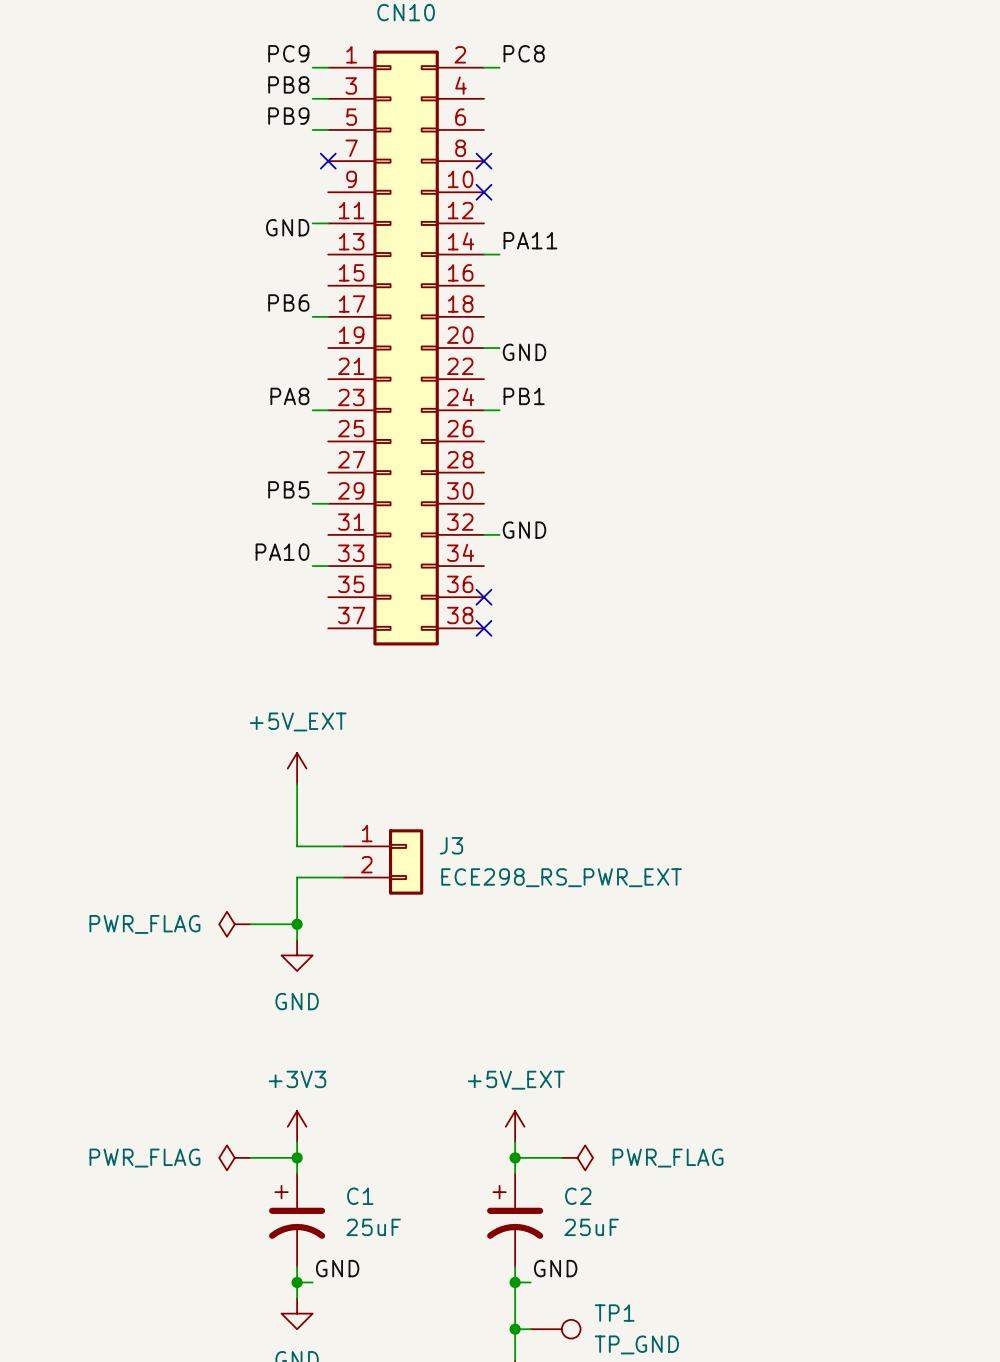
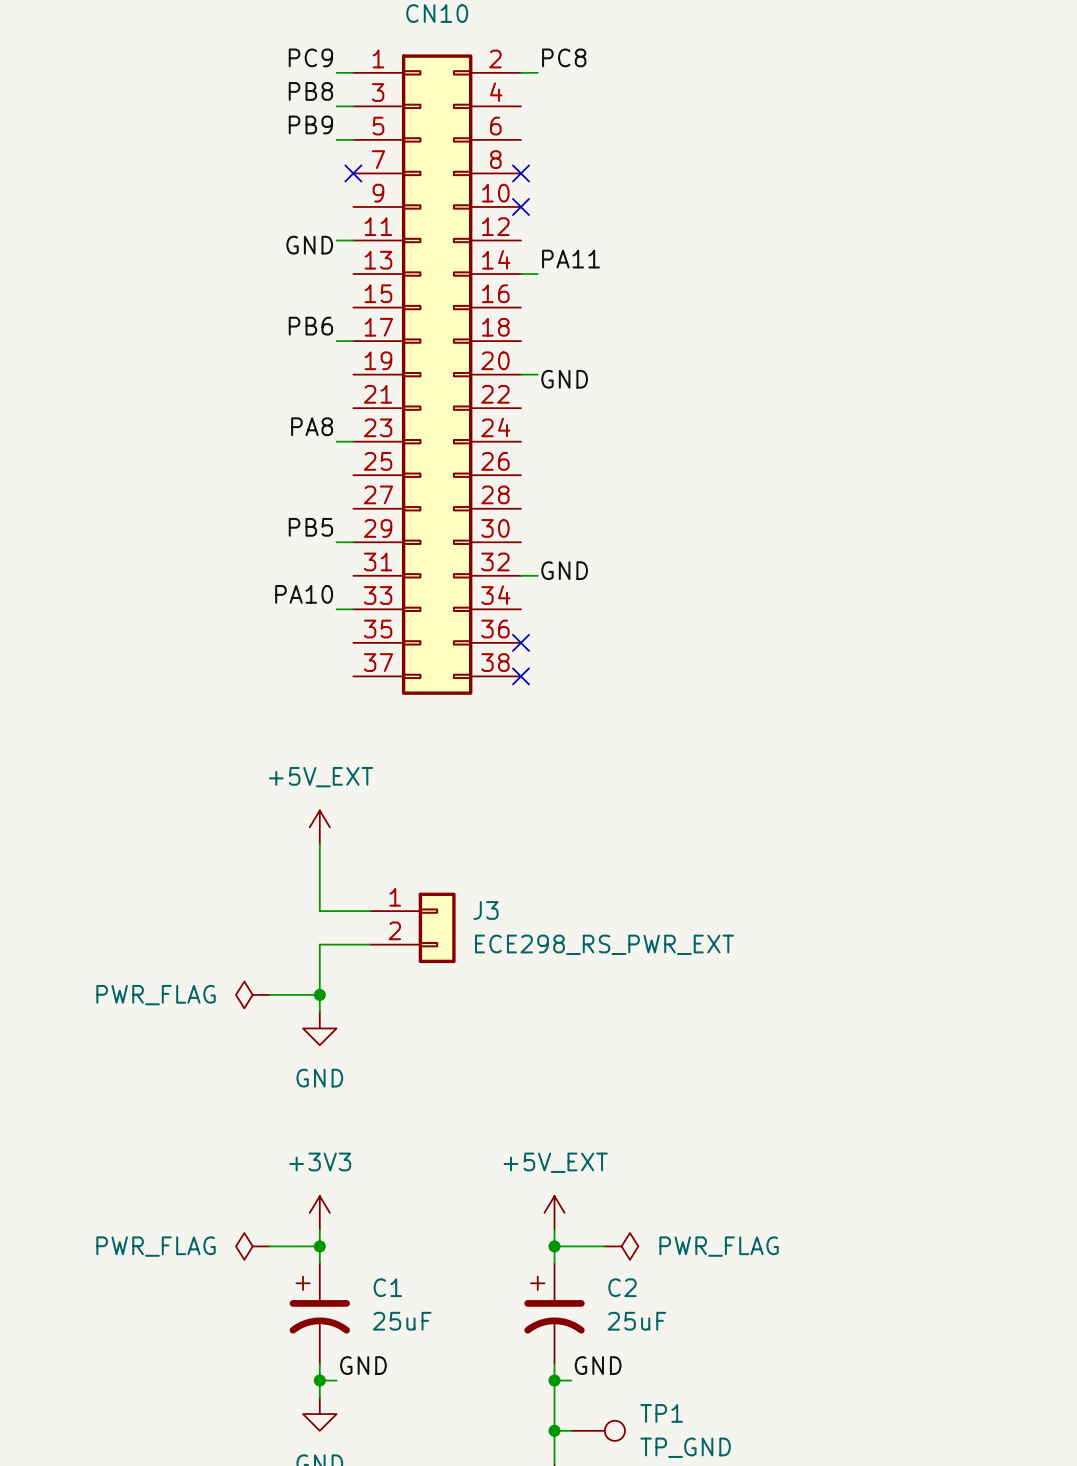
label: PB1 (524, 396) -> none
wire: (483, 410) (499, 410) -> none

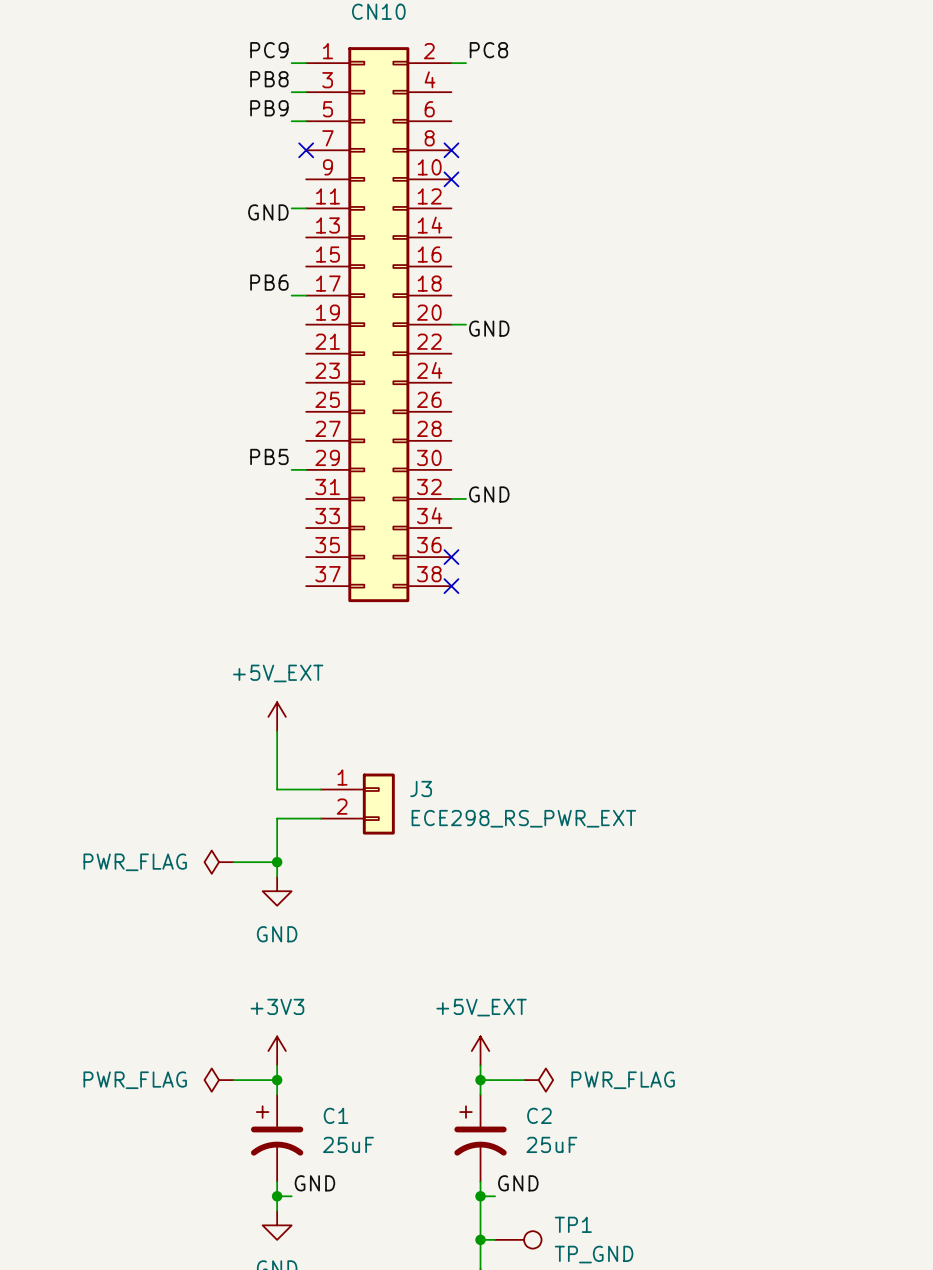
label: PA11 (571, 259) -> none
wire: (520, 274) (537, 274) -> none
label: PA8 (312, 426) -> none
wire: (336, 441) (353, 441) -> none
label: PA10 (304, 594) -> none
wire: (336, 609) (353, 609) -> none

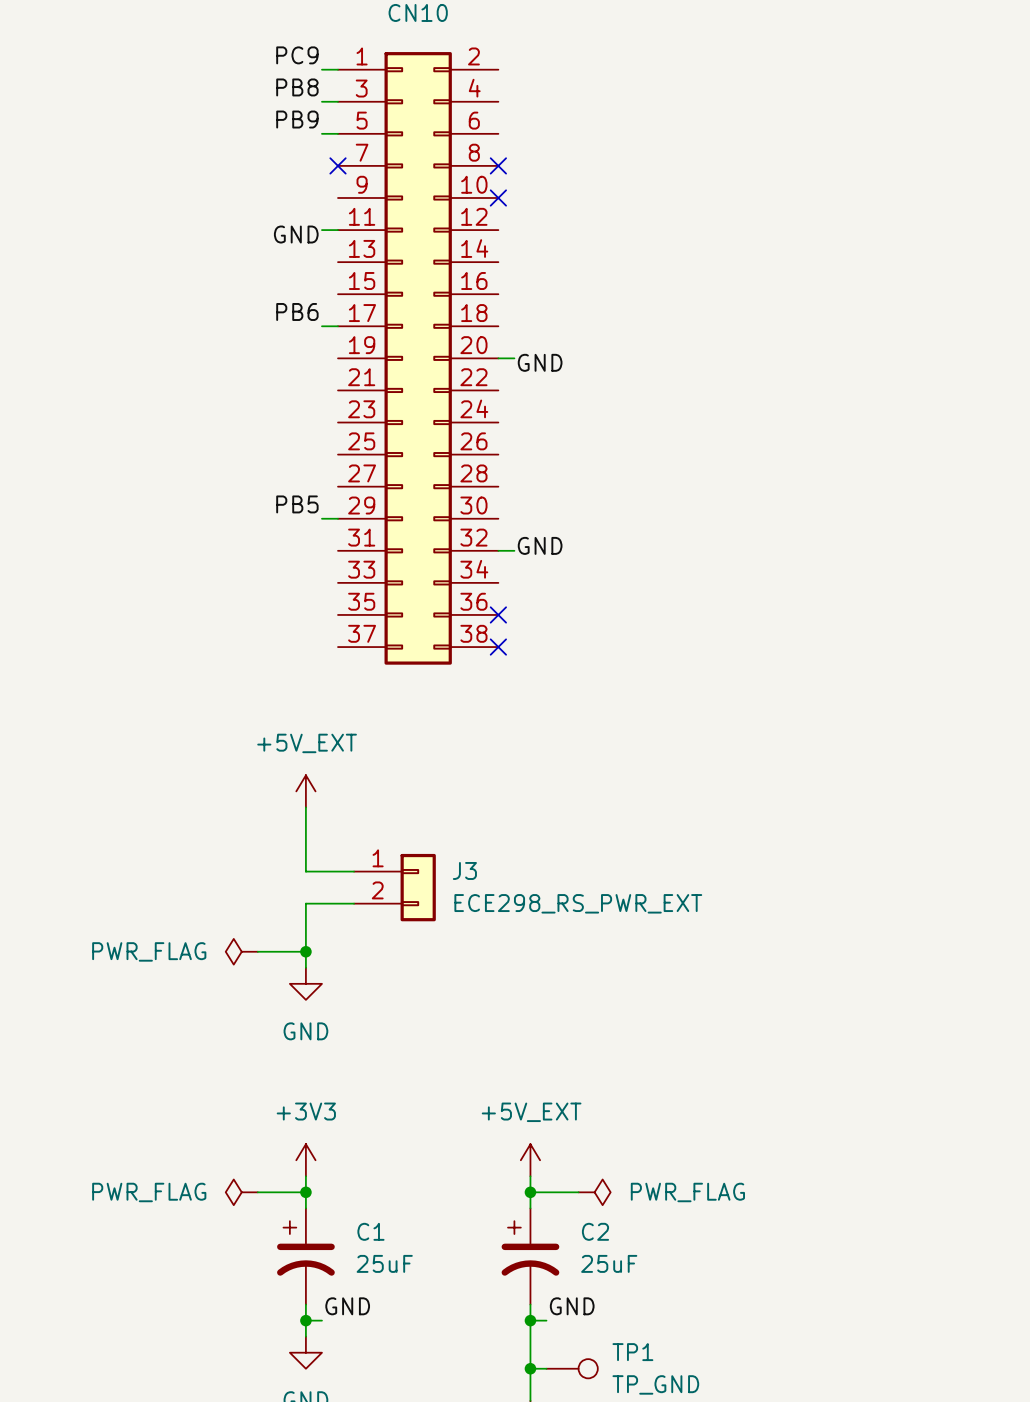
label: PC8 (488, 50) -> none
wire: (451, 63) (465, 63) -> none

